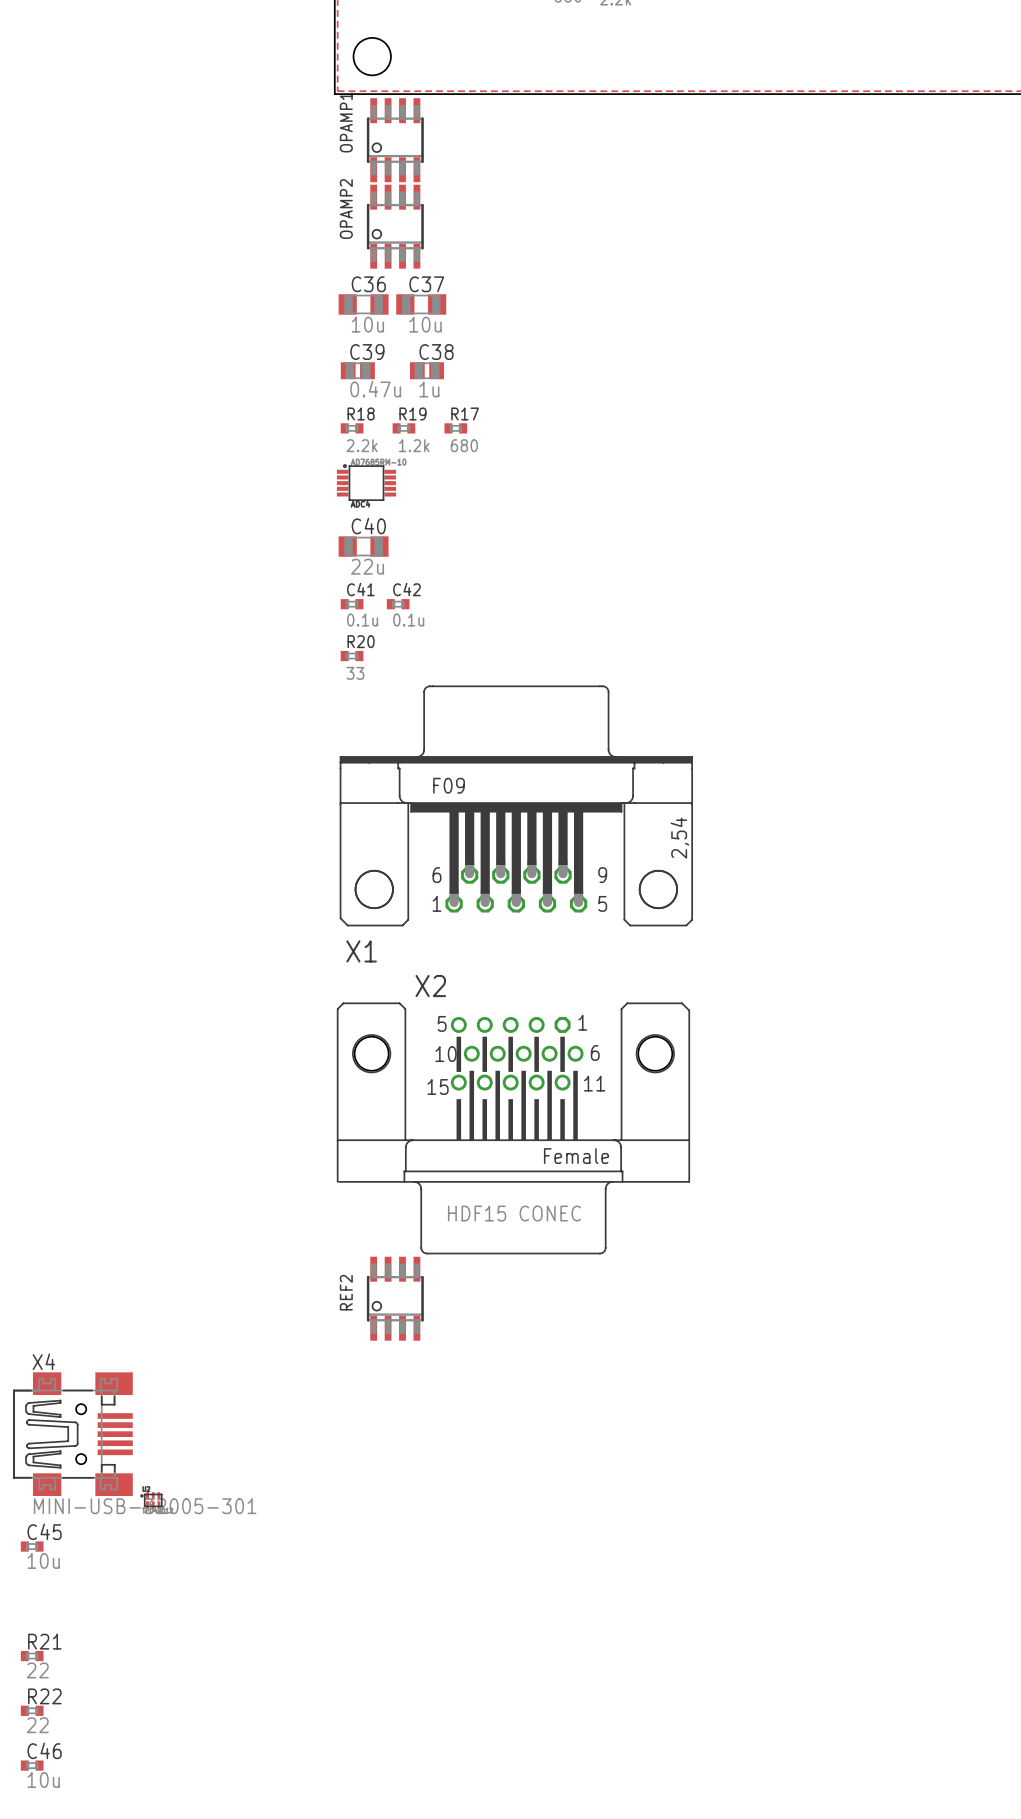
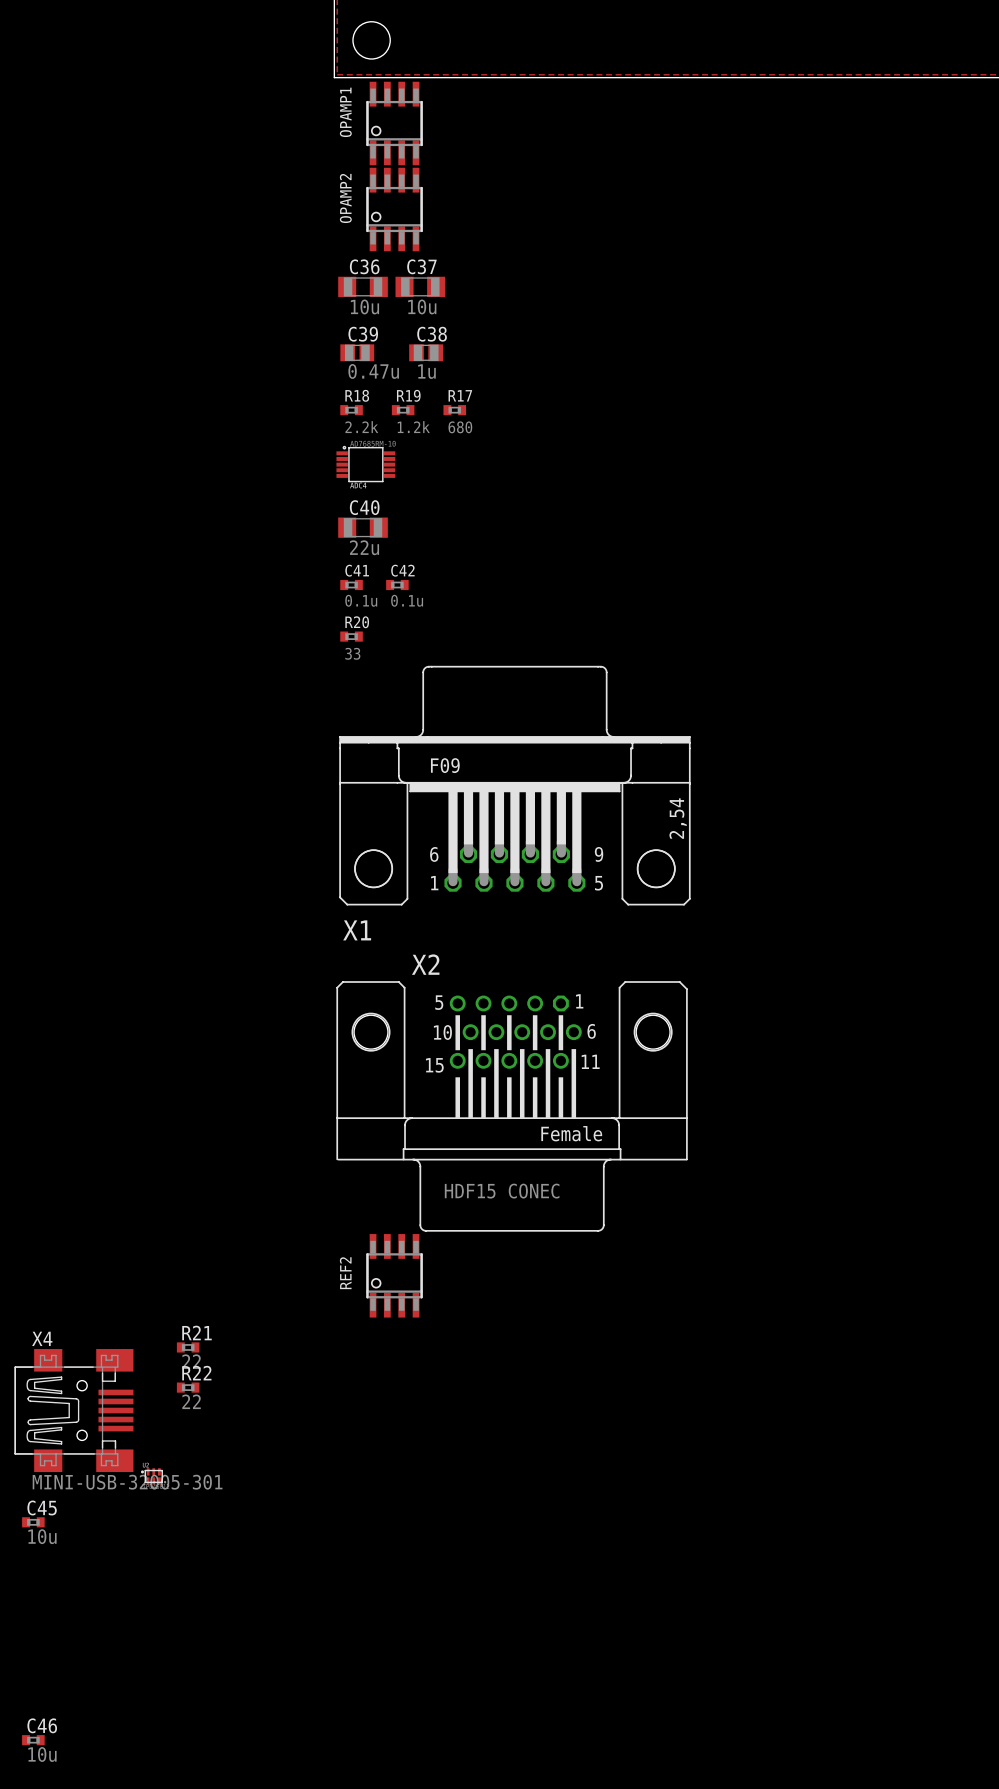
R21 position: (32, 1656) -> (188, 1347)
R22 position: (32, 1710) -> (188, 1387)

